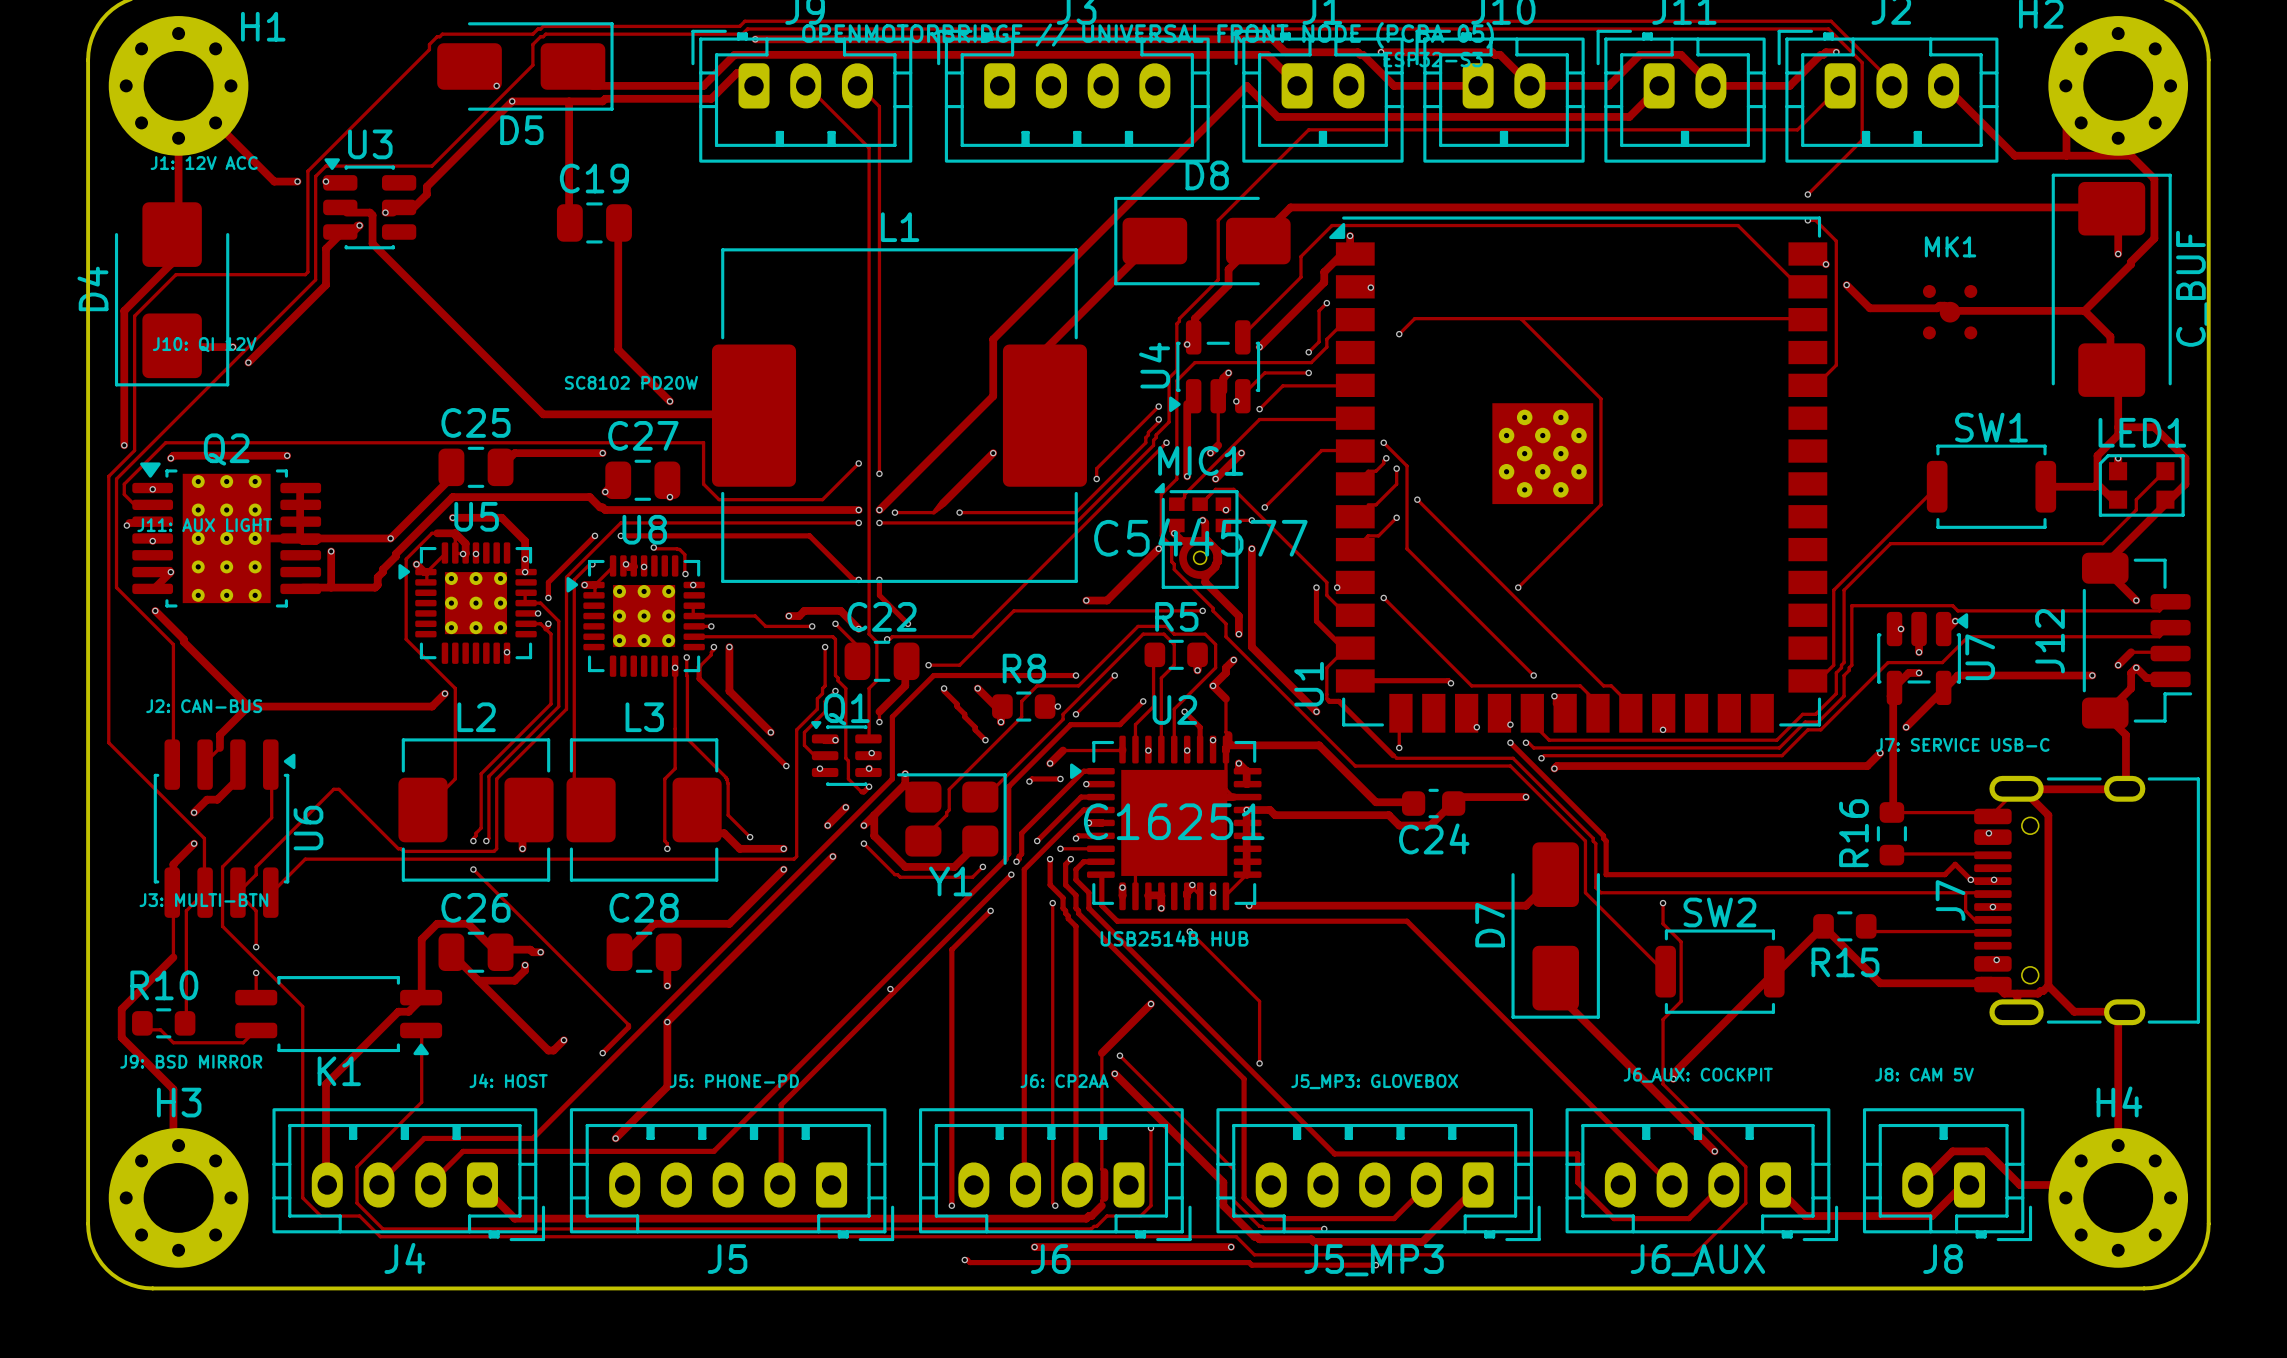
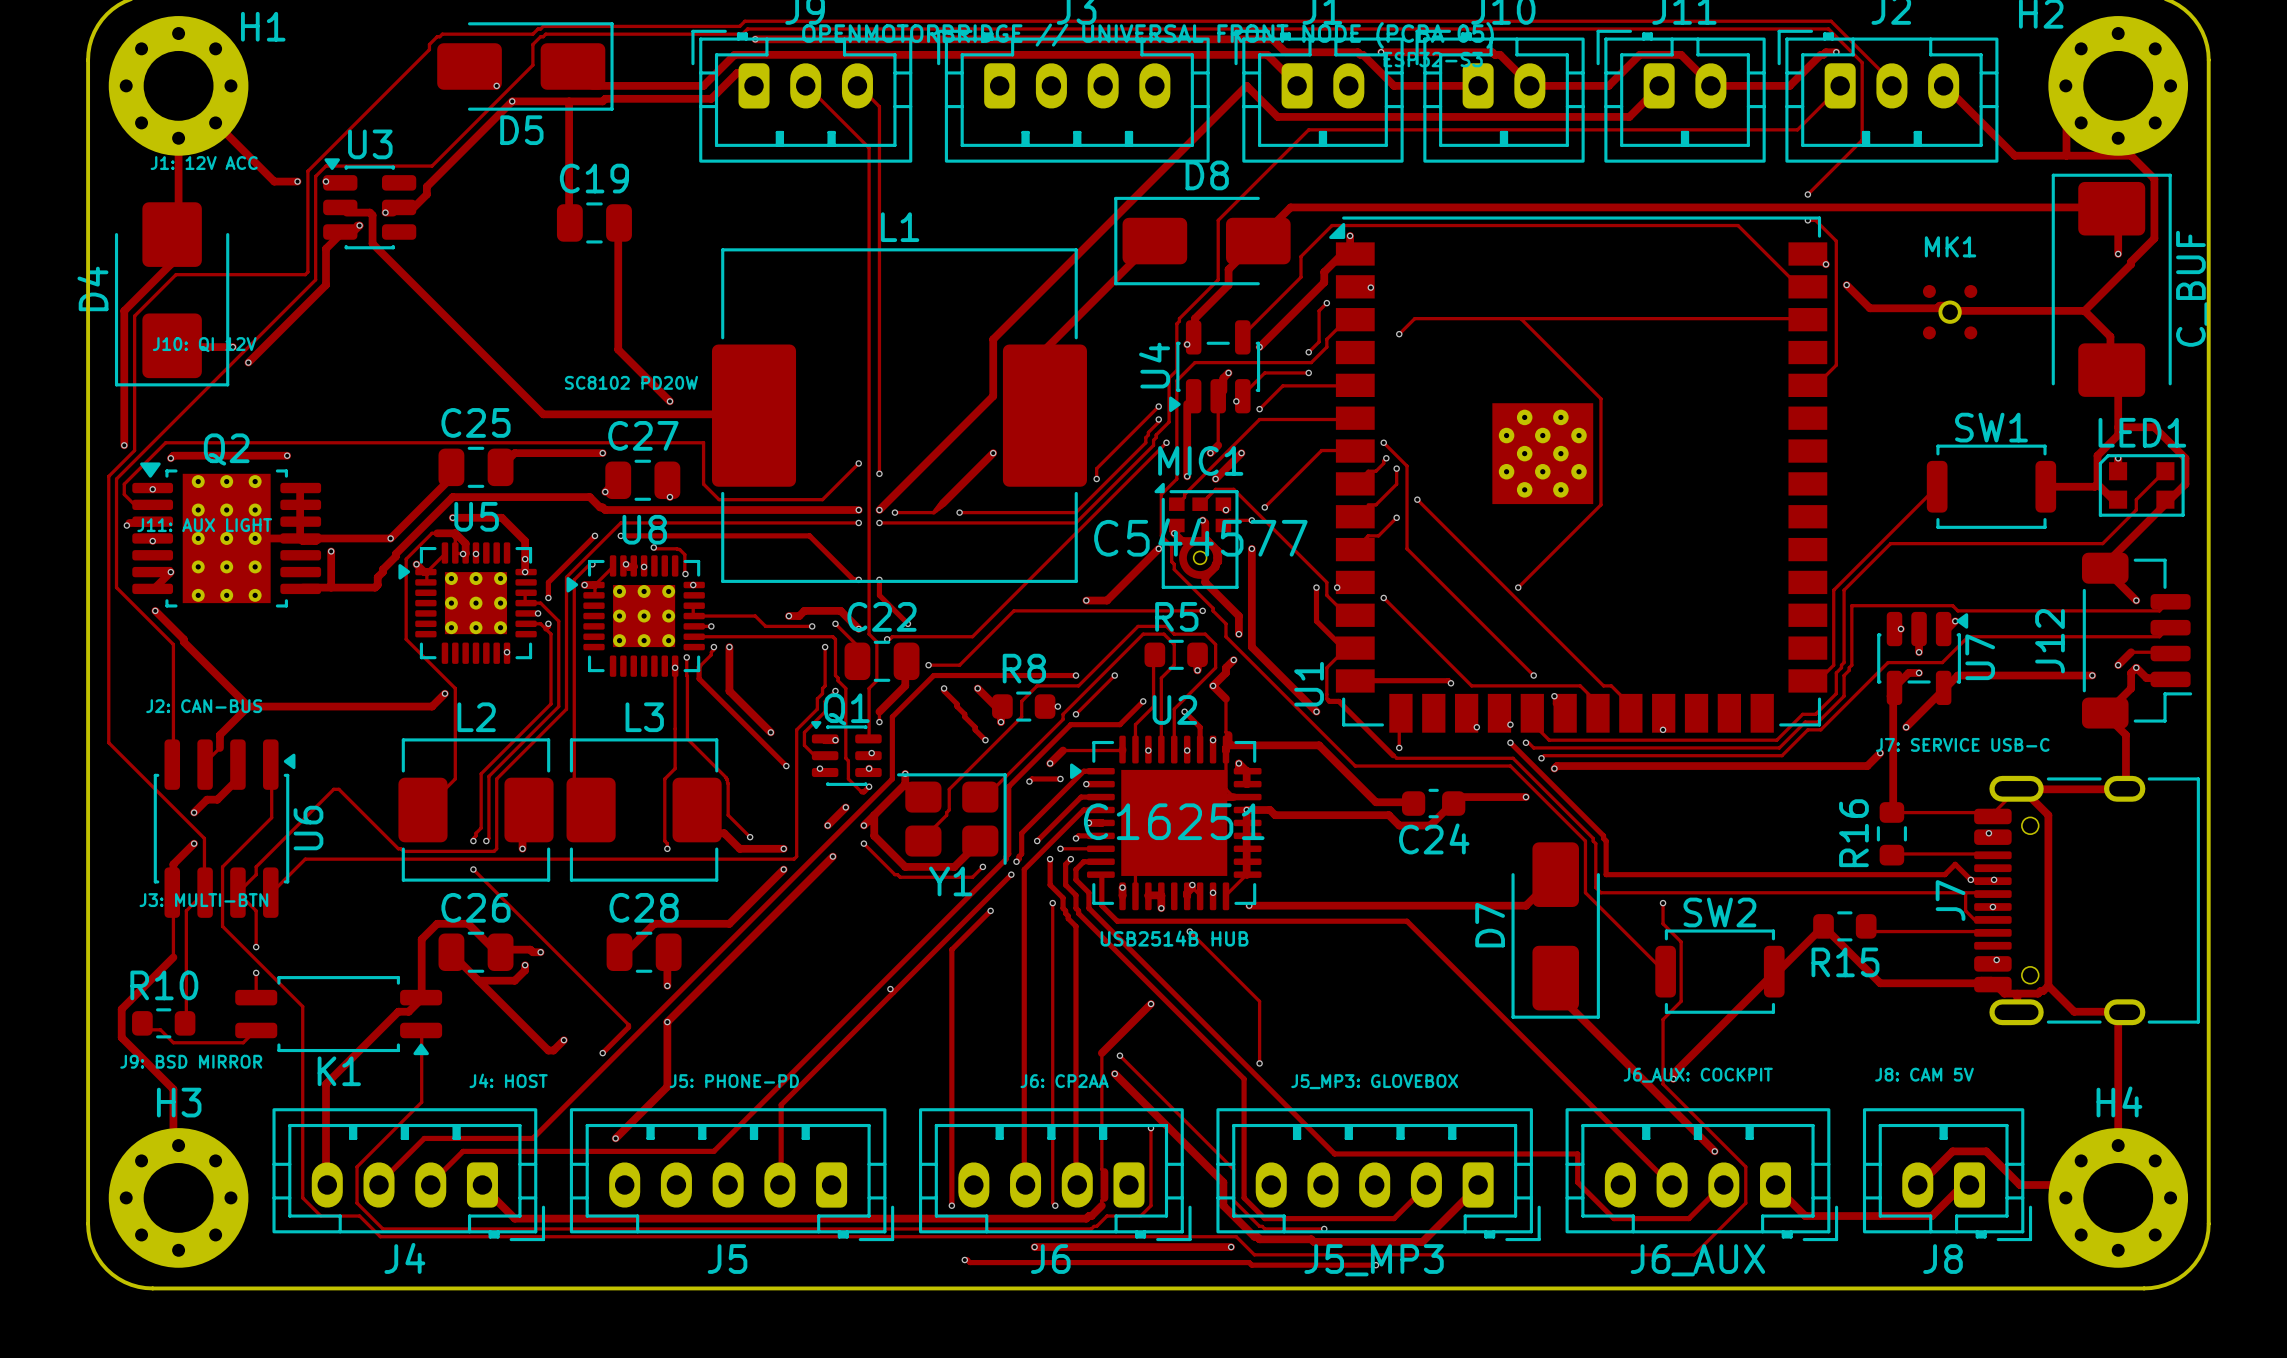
MK1 footprint: [1922, 285, 1978, 340] -> [1922, 285, 1978, 340]

